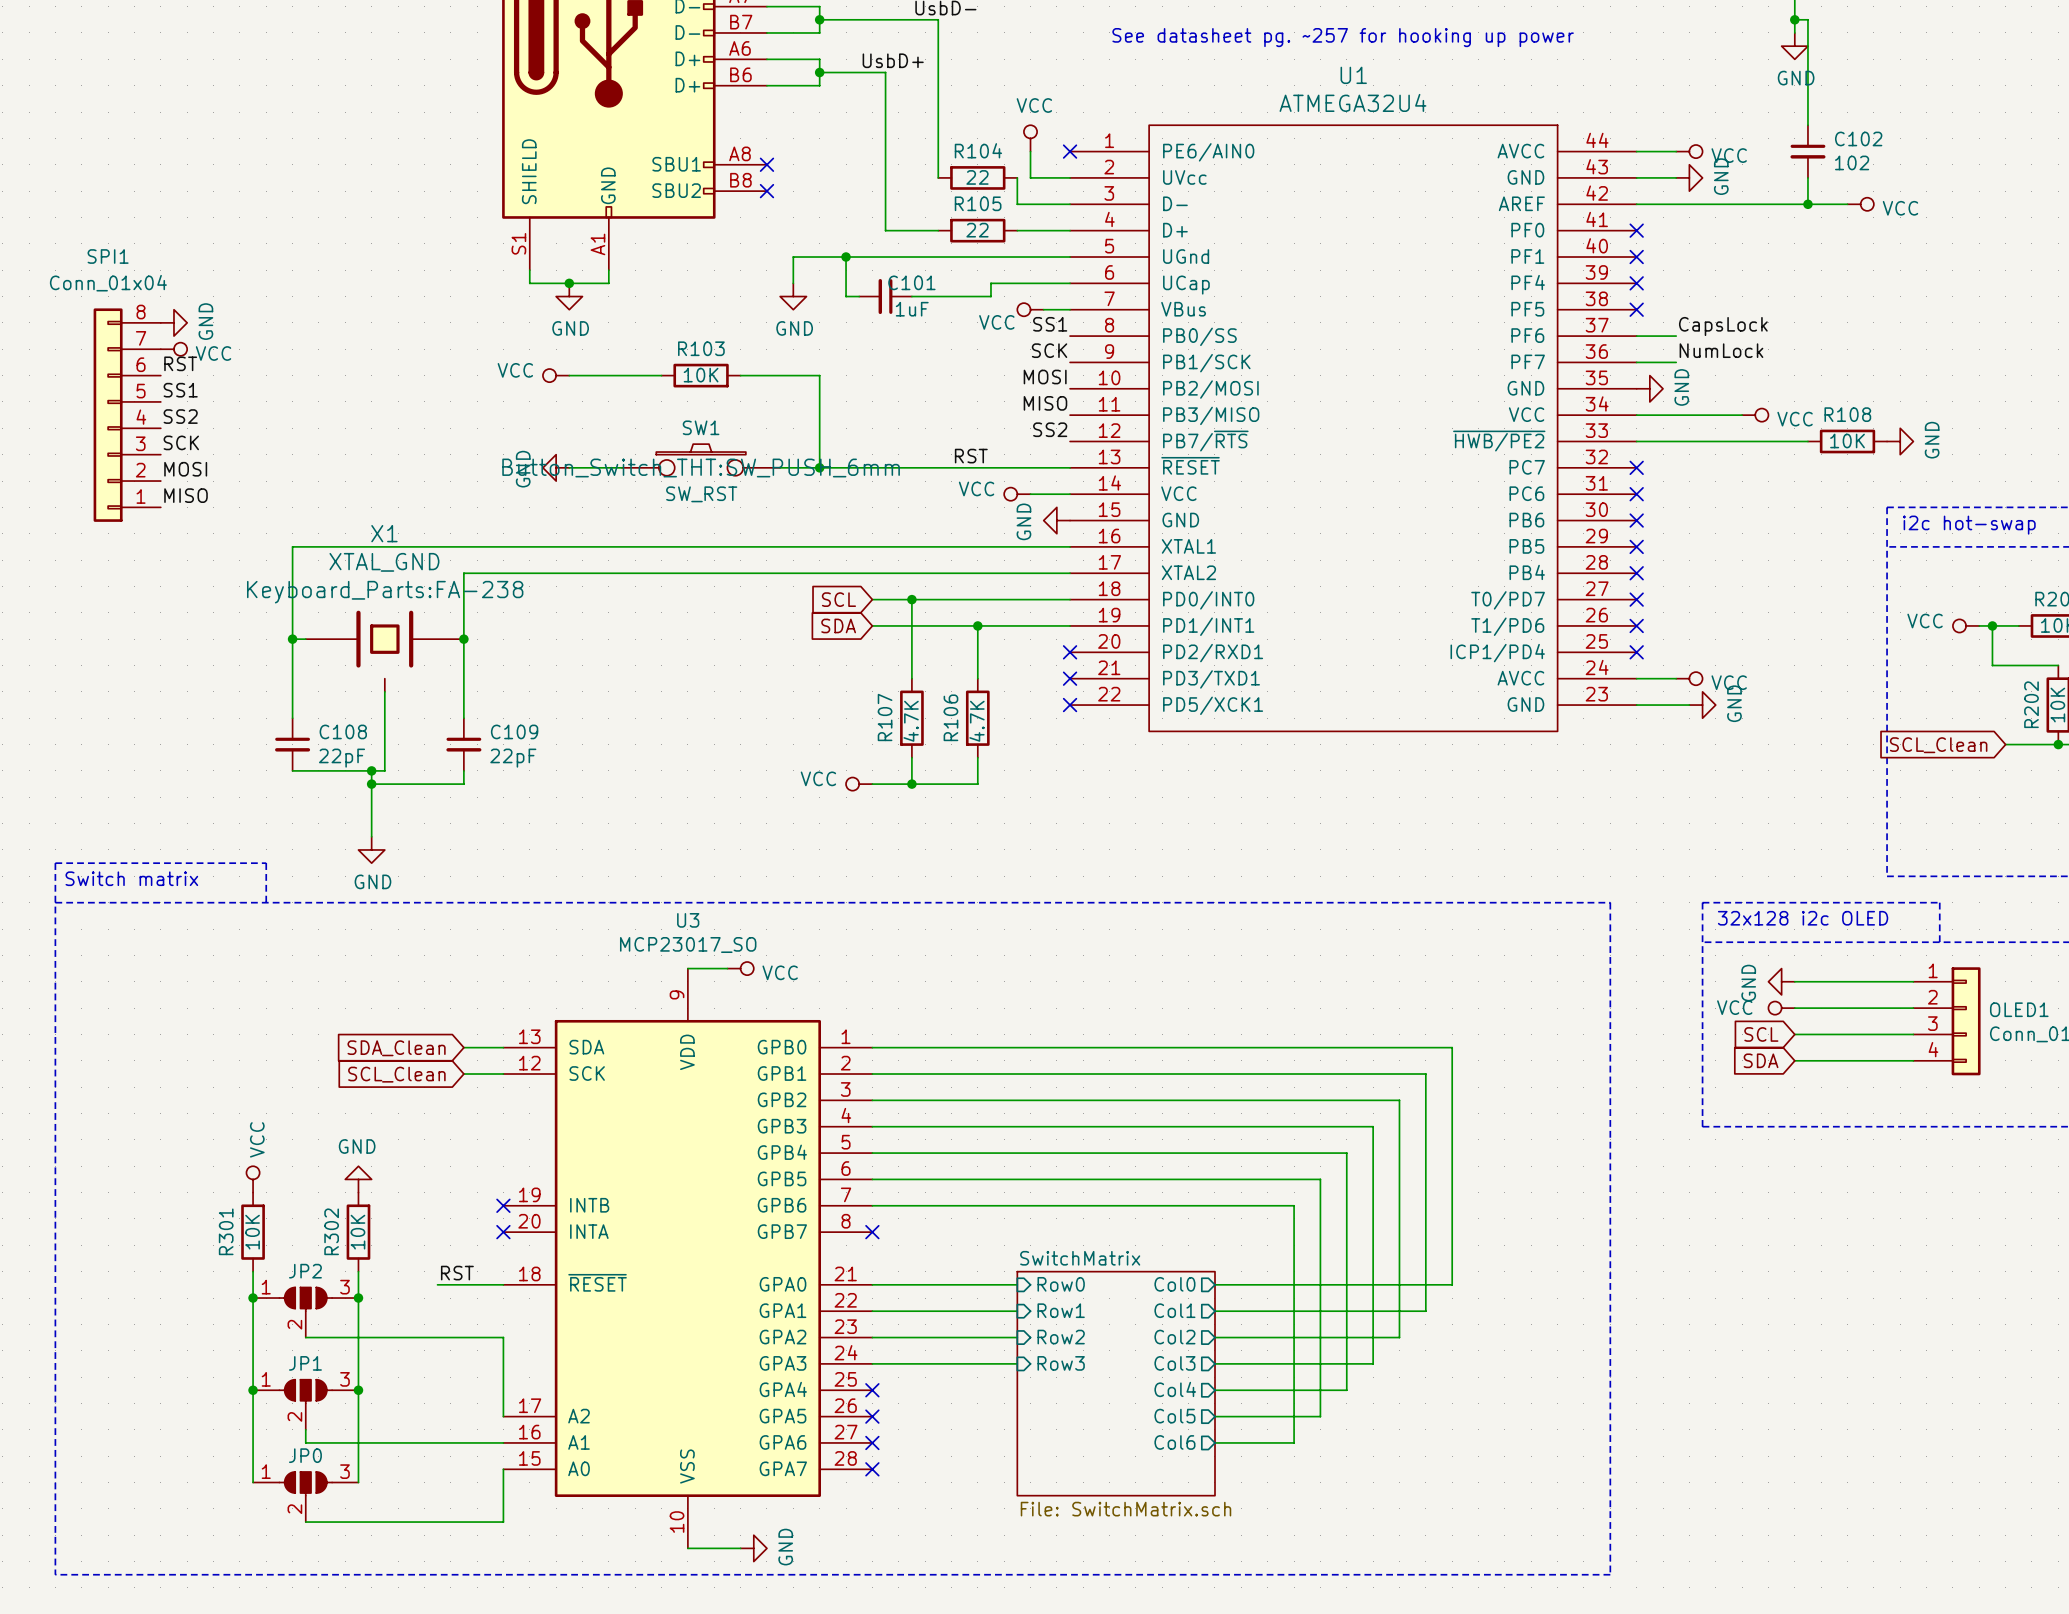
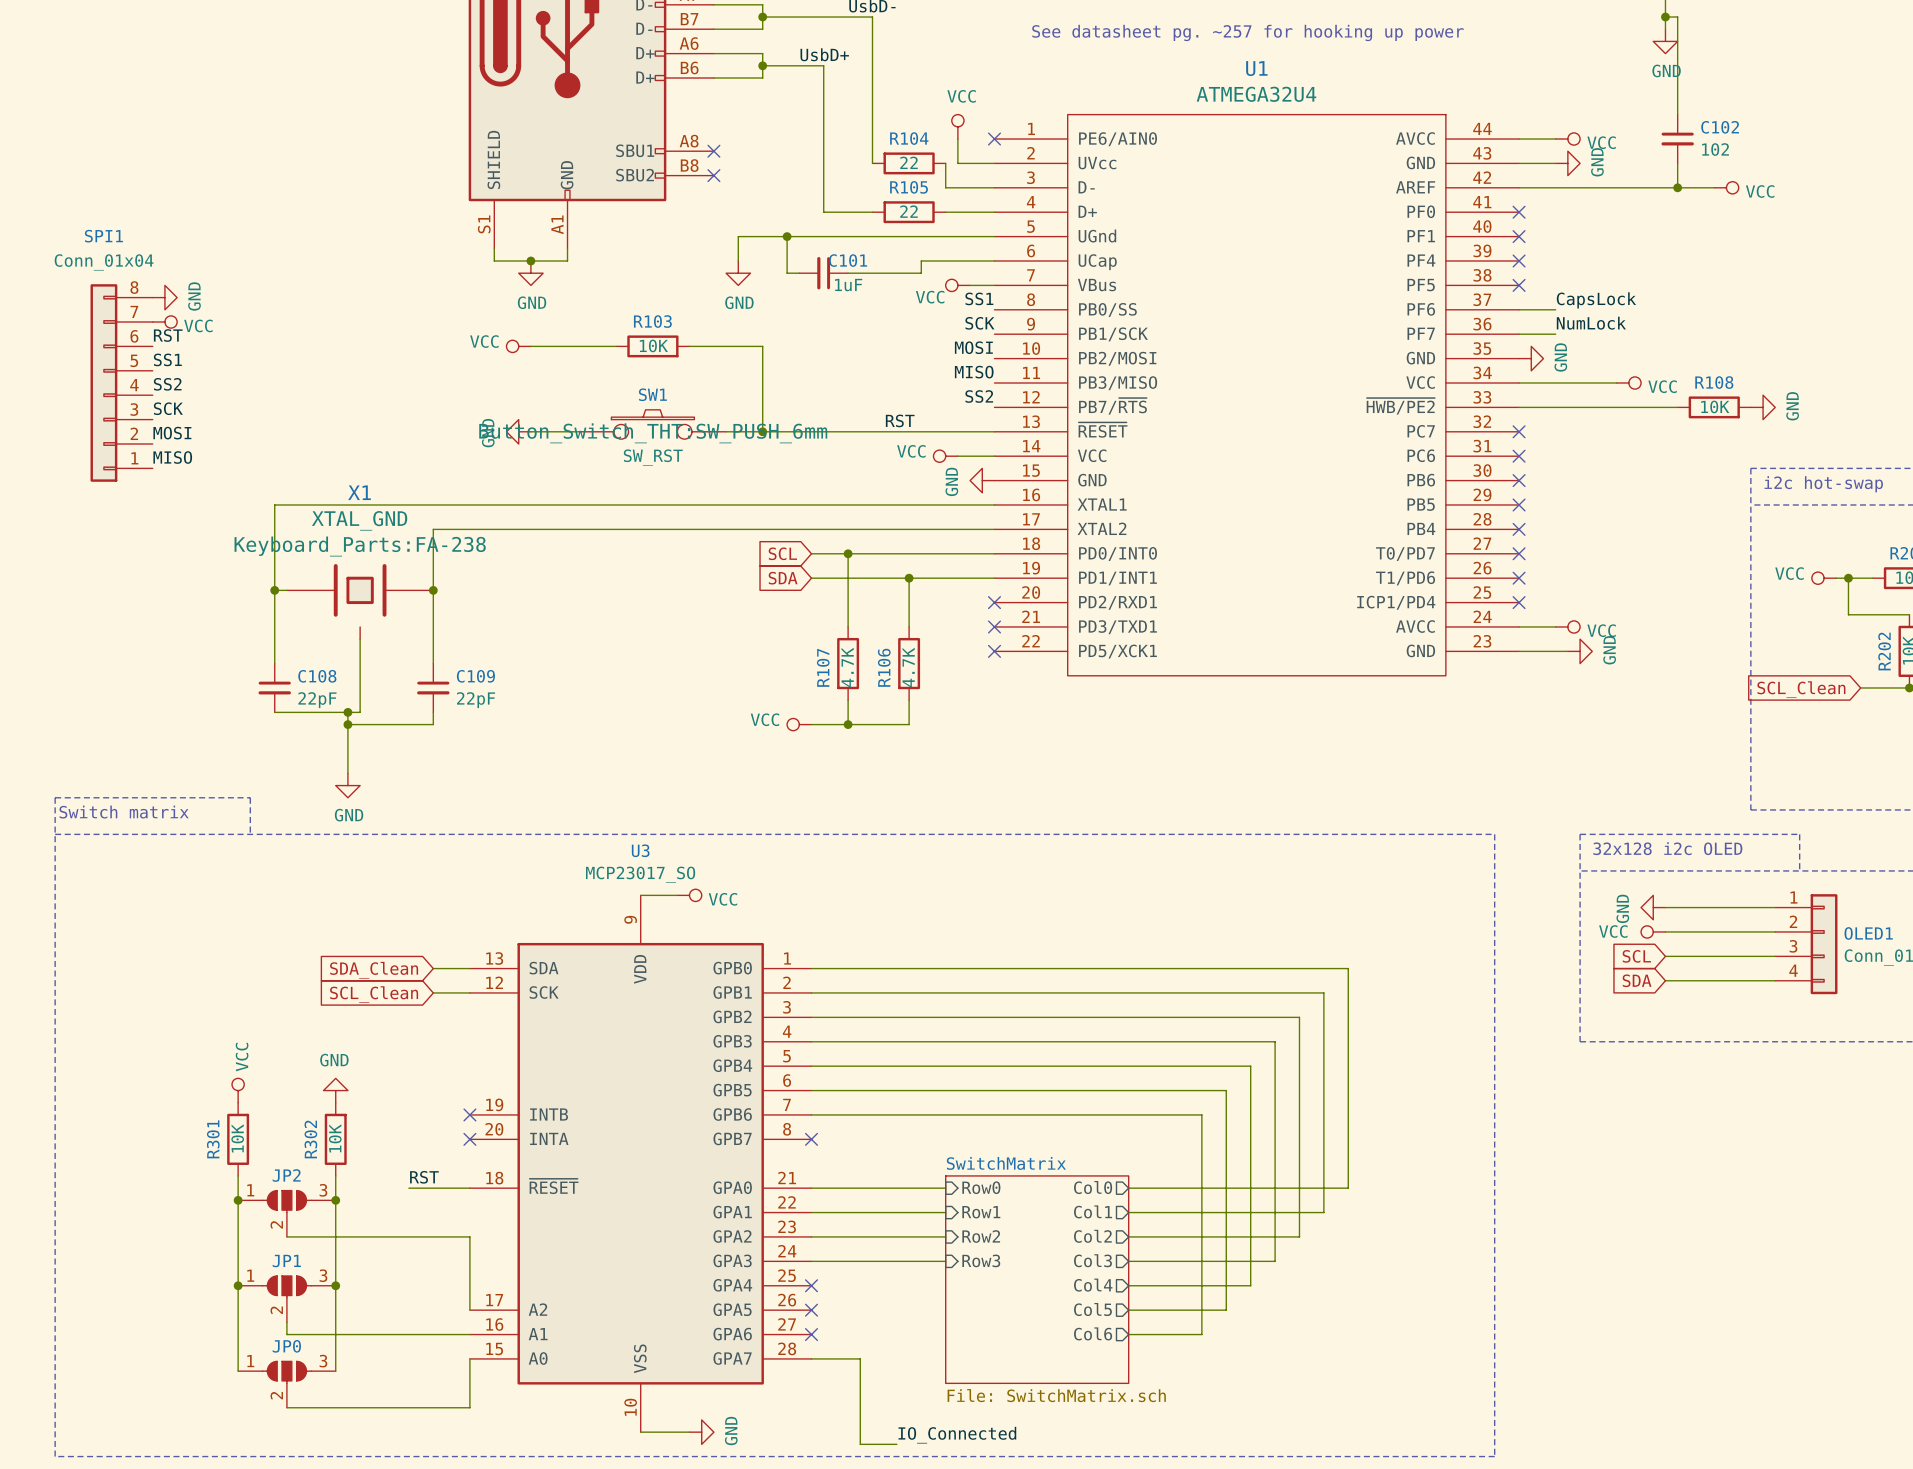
wire: none -> (811, 1358) (860, 1358) (860, 1444) (896, 1444)
no-connect mark: (872, 1469) -> none
label: none -> IO_Connected (957, 1435)

